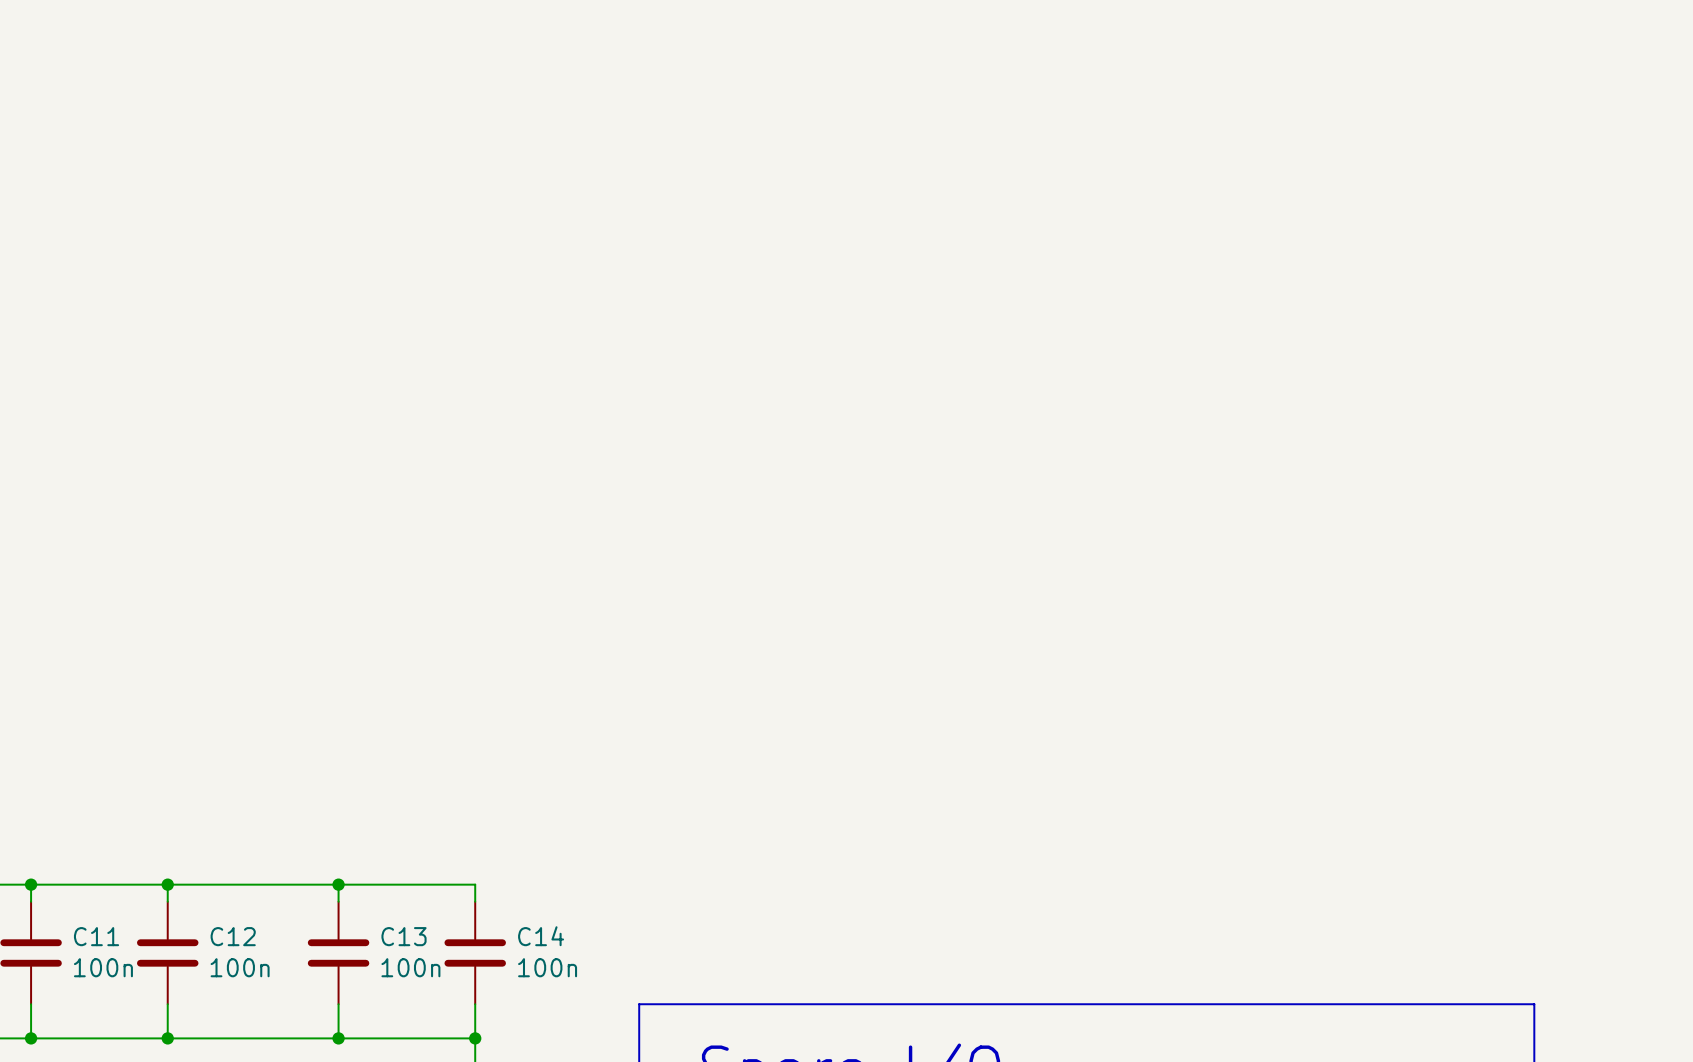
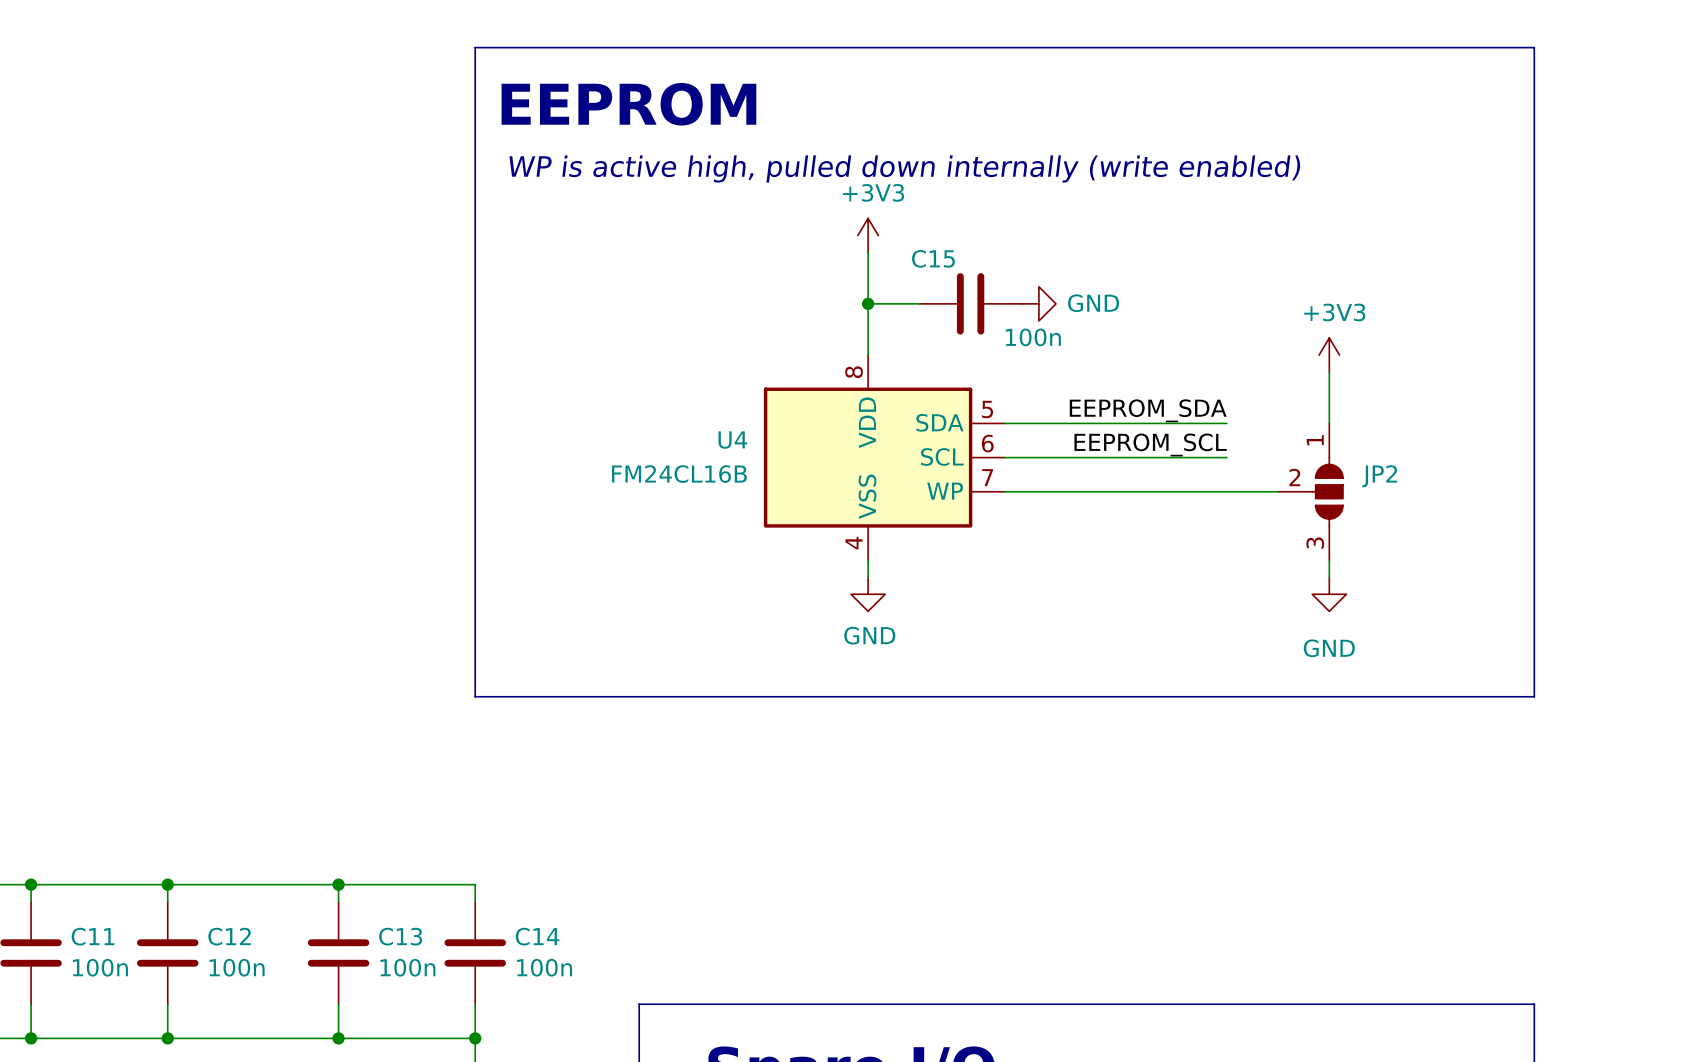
line: none -> (475, 47) (1534, 47) (1534, 696) (475, 696) (475, 47)
text: none -> EEPROM (628, 104)
text: none -> WP is active high, pulled down internally (write enabled) (904, 168)
power symbol: none -> +3V3 (868, 235)
wire: none -> (868, 252) (868, 355)
wire: none -> (868, 303) (919, 303)
junction: none -> (868, 303)
C15: none -> 100n (970, 303)
power symbol: none -> GND (1038, 303)
power symbol: none -> +3V3 (1329, 355)
wire: none -> (1329, 372) (1329, 423)
label: none -> EEPROM_SDA (1148, 410)
wire: none -> (1004, 423) (1226, 423)
label: none -> EEPROM_SCL (1150, 444)
U4: none -> FM24CL16B (884, 457)
wire: none -> (1004, 457) (1226, 457)
wire: none -> (1004, 491) (1278, 491)
JP2: none -> (1310, 491)
wire: none -> (868, 560) (868, 577)
wire: none -> (1329, 560) (1329, 577)
power symbol: none -> GND (868, 594)
power symbol: none -> GND (1329, 594)

